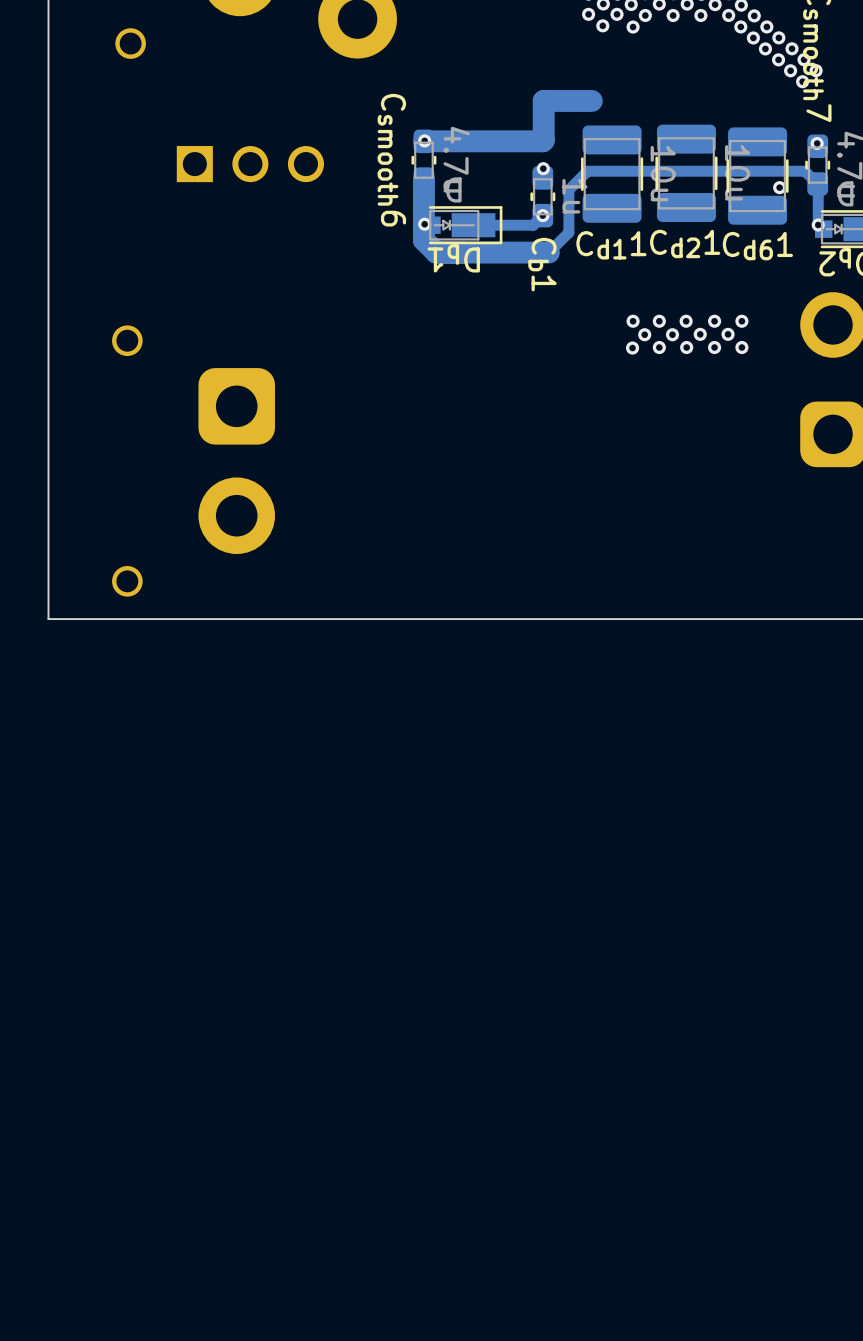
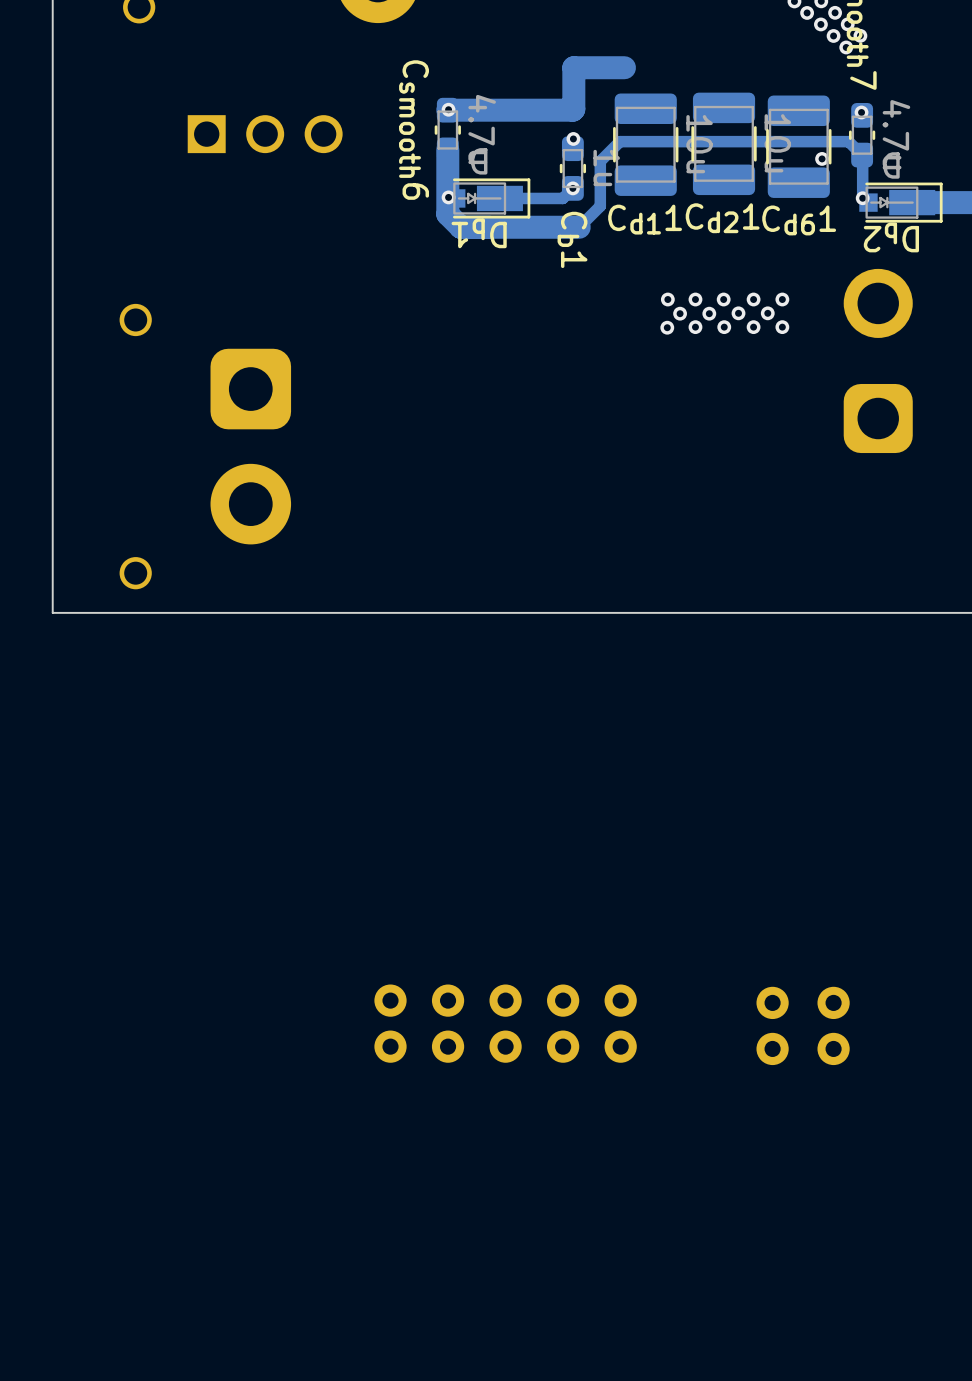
part: none -> (390, 1023)
part: none -> (448, 1023)
part: none -> (505, 1023)
part: none -> (563, 1023)
part: none -> (620, 1023)
part: none -> (772, 1025)
part: none -> (833, 1025)

